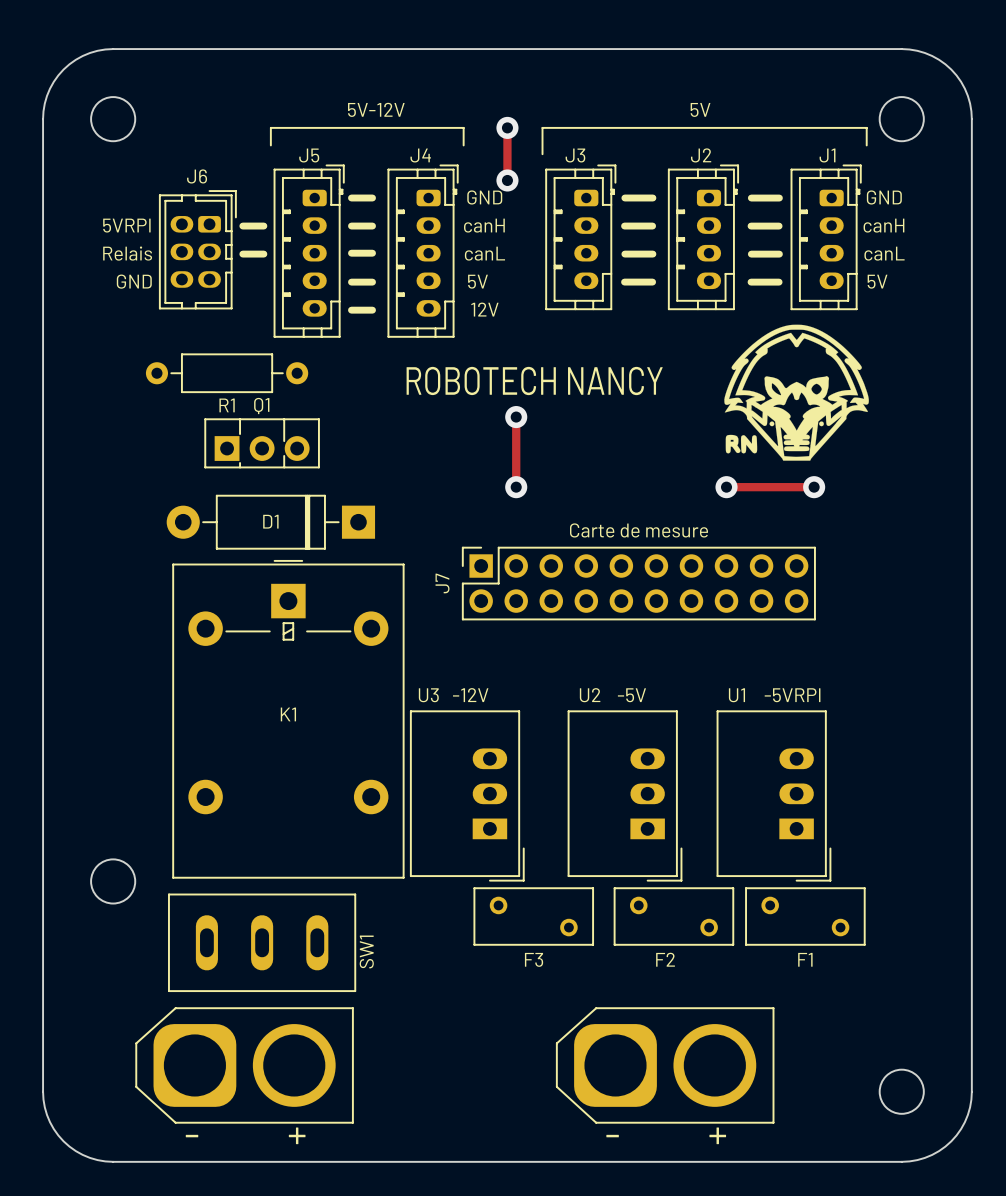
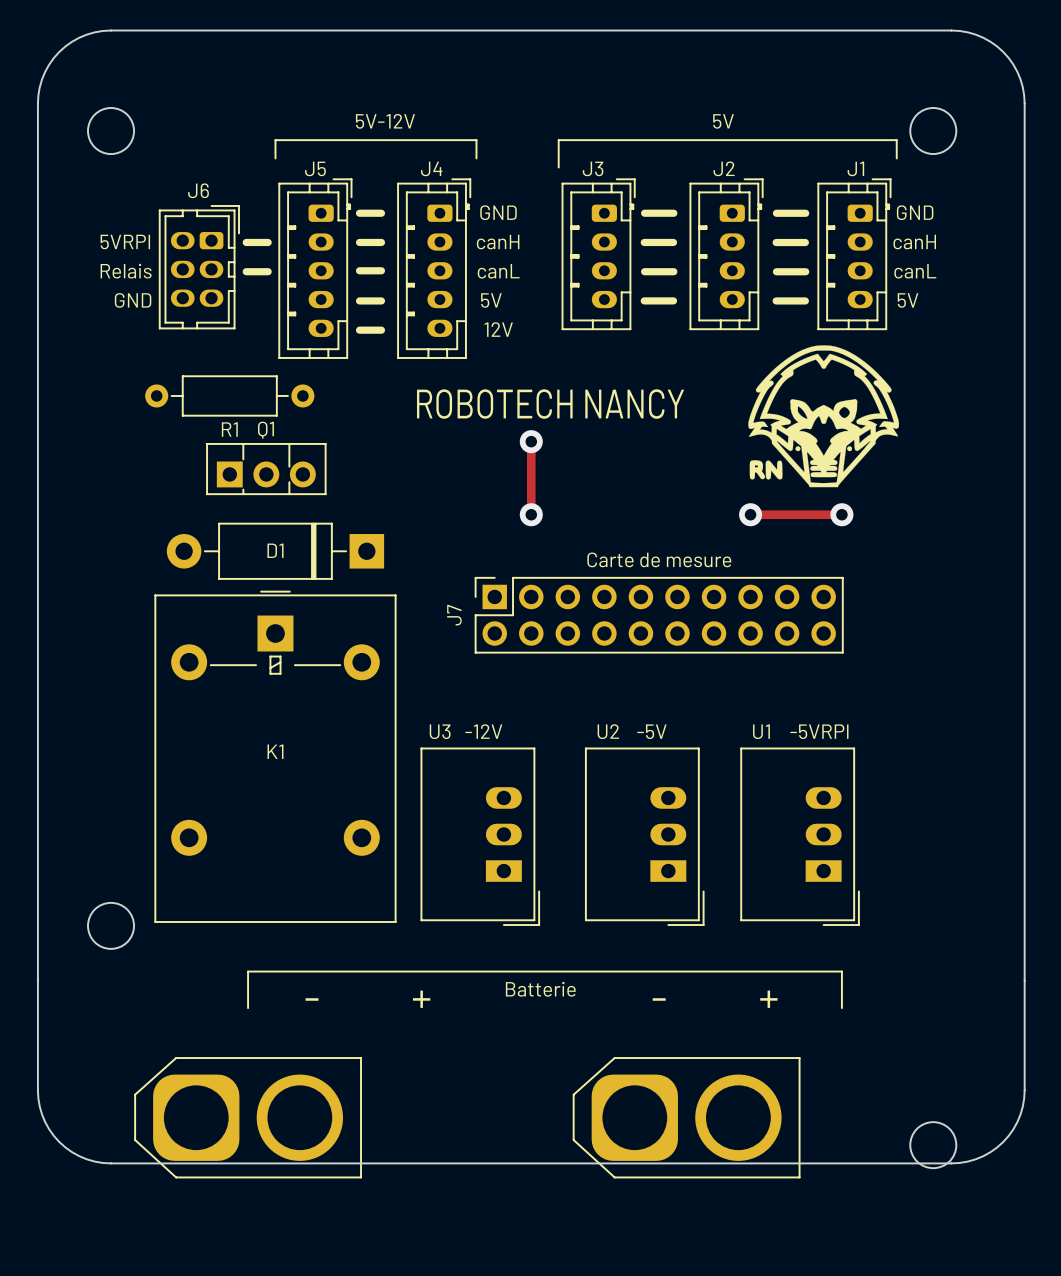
board edge: (43, 119) (46, 95) (53, 81) (63, 69) (75, 59) (90, 52) (113, 49) (901, 49) (924, 52) (939, 59) (951, 69) (961, 81) (967, 95) (971, 119) (971, 1099) (964, 1122) (951, 1141) (932, 1154) (909, 1161) (105, 1161) (90, 1157) (75, 1151) (58, 1135) (50, 1122) (43, 1099) (43, 1039) -> (37, 131) (39, 87) (45, 71) (53, 58) (65, 46) (79, 37) (94, 32) (111, 30) (959, 30) (983, 37) (1003, 51) (1017, 71) (1022, 87) (1024, 103) (1024, 1090) (1022, 1106) (1017, 1122) (1003, 1142) (990, 1152) (975, 1159) (951, 1163) (111, 1163) (94, 1161) (79, 1156) (59, 1142) (45, 1122) (39, 1106) (37, 1090)
track: (507, 127) (507, 180) -> none
via: (507, 127) -> none
via: (507, 180) -> none
K1 position: (288, 719) -> (275, 756)
F3: (533, 916) -> none
F2: (673, 916) -> none
F1: (805, 916) -> none
SW1: (262, 942) -> none
text: none -> Batterie (540, 989)
text: none -> + (421, 999)
text: none -> + (768, 999)
text: none -> - (312, 999)
text: none -> - (659, 999)
line: none -> (248, 1008) (248, 971) (841, 971) (841, 1008)
text: + (297, 1135) -> none
text: + (717, 1135) -> none
text: - (192, 1136) -> none
text: - (612, 1136) -> none

